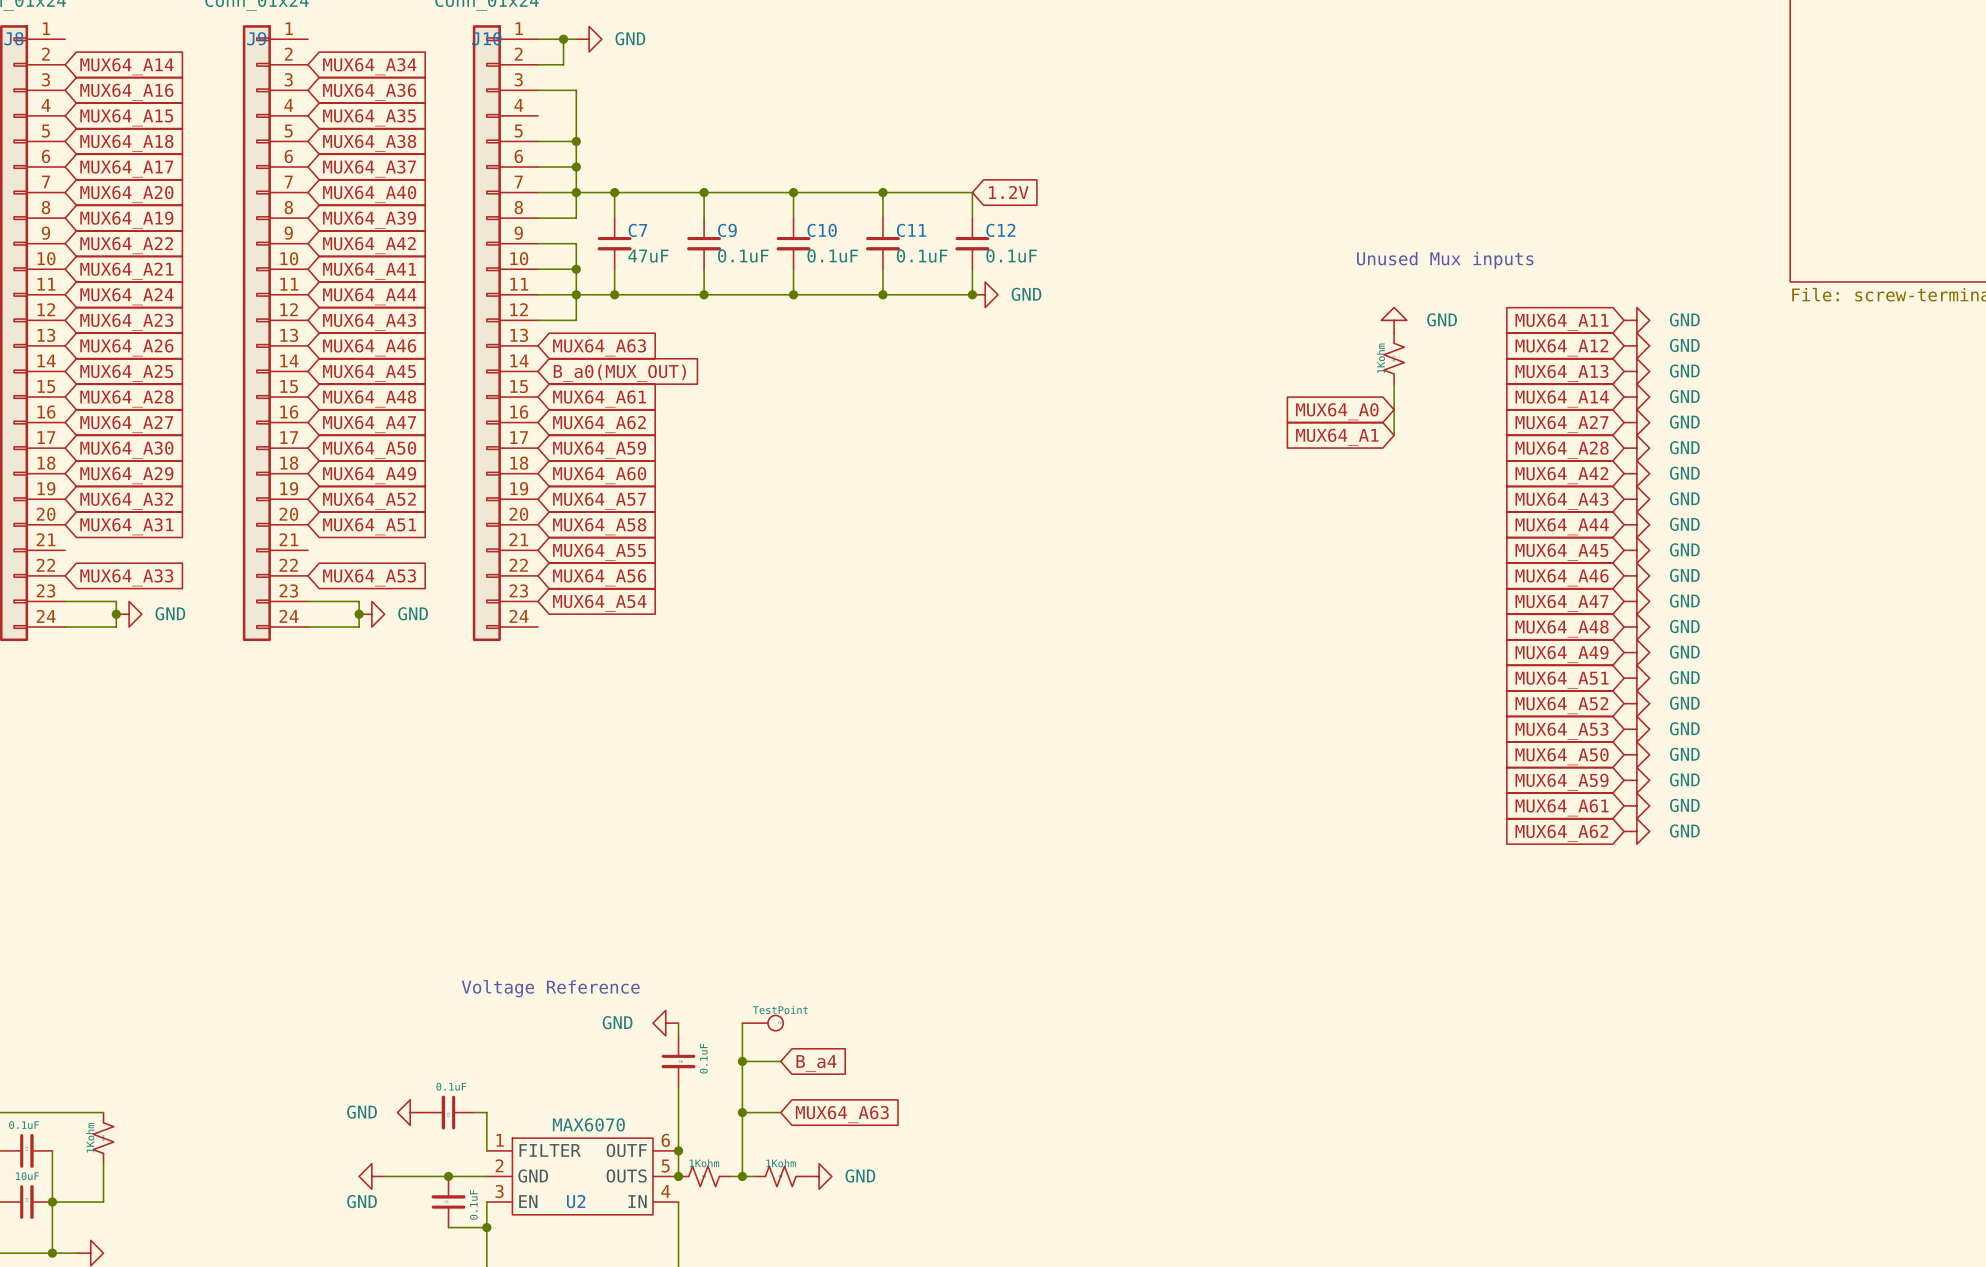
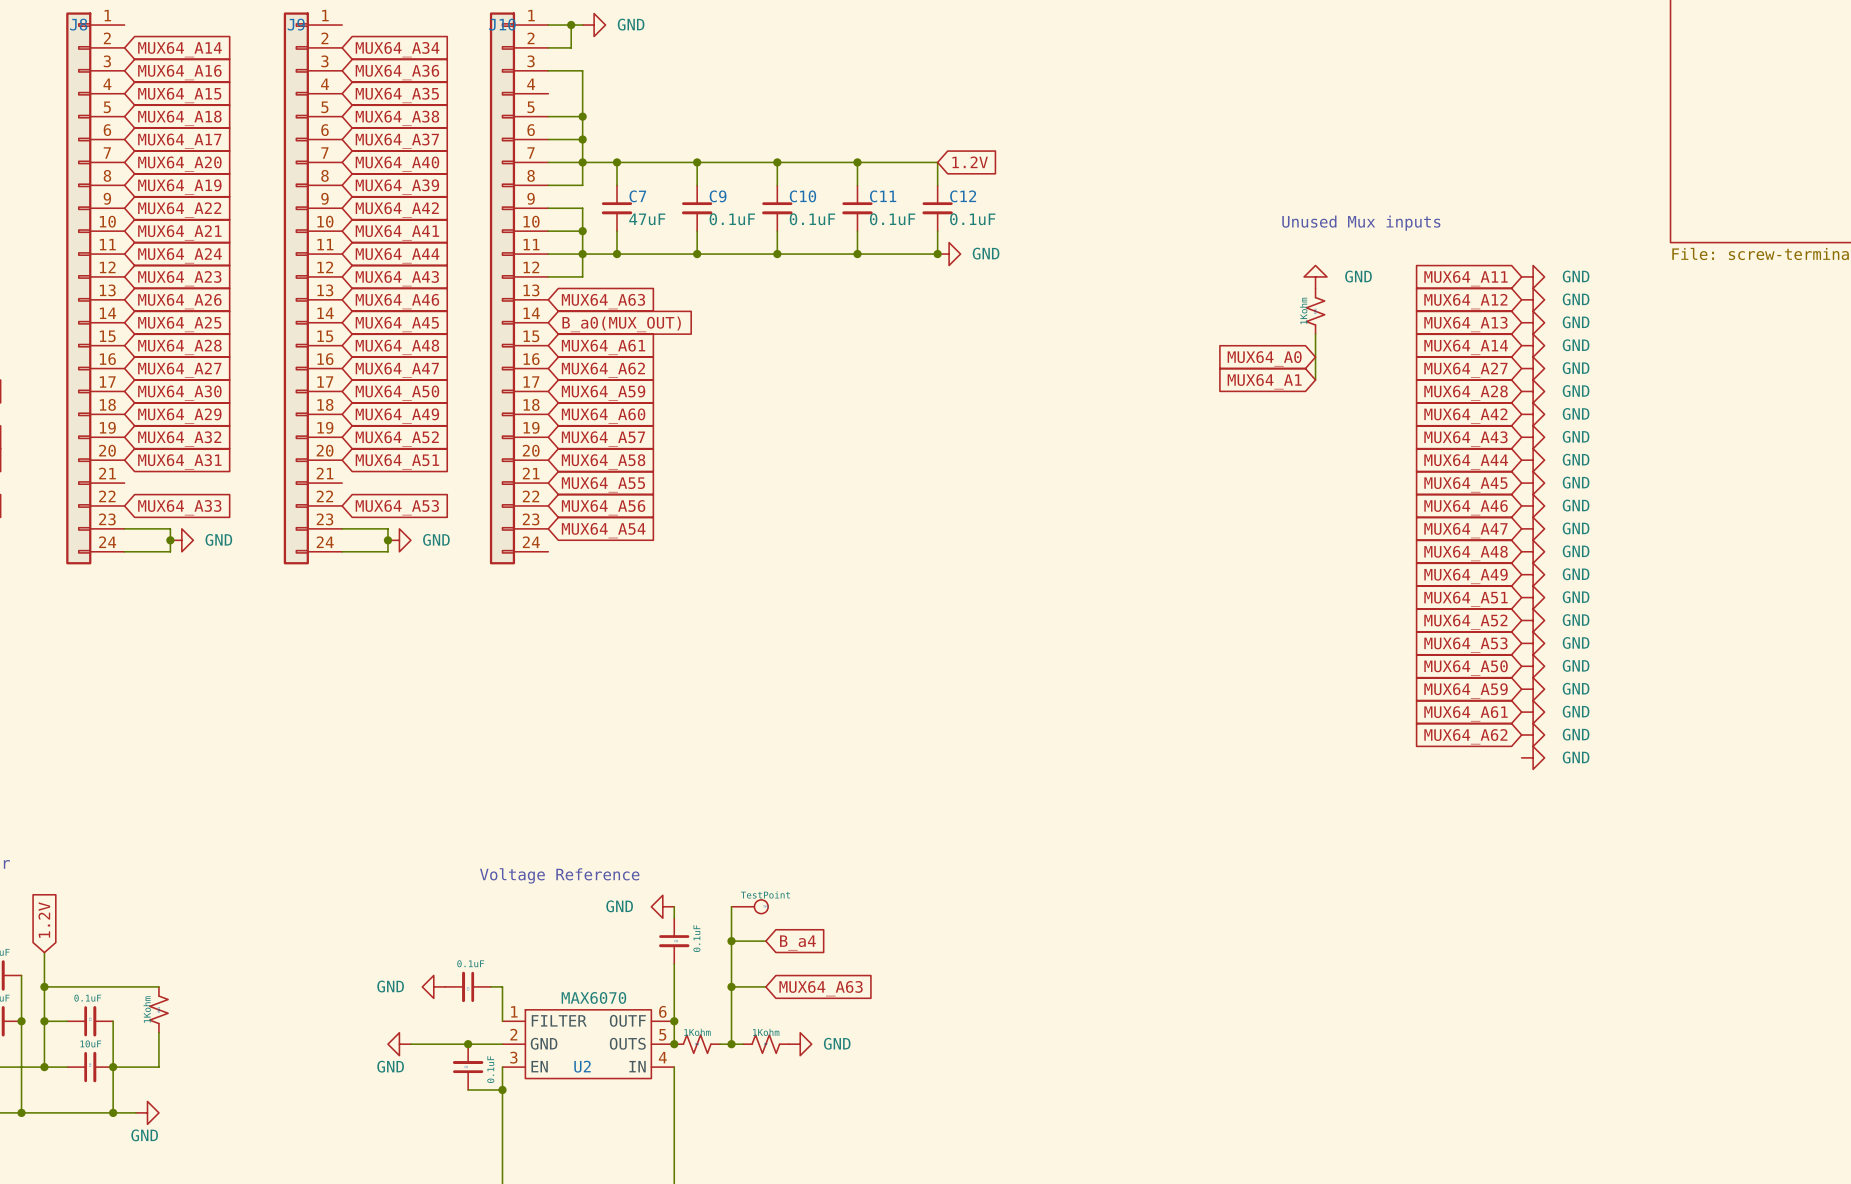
power symbol: none -> GND (1533, 757)

